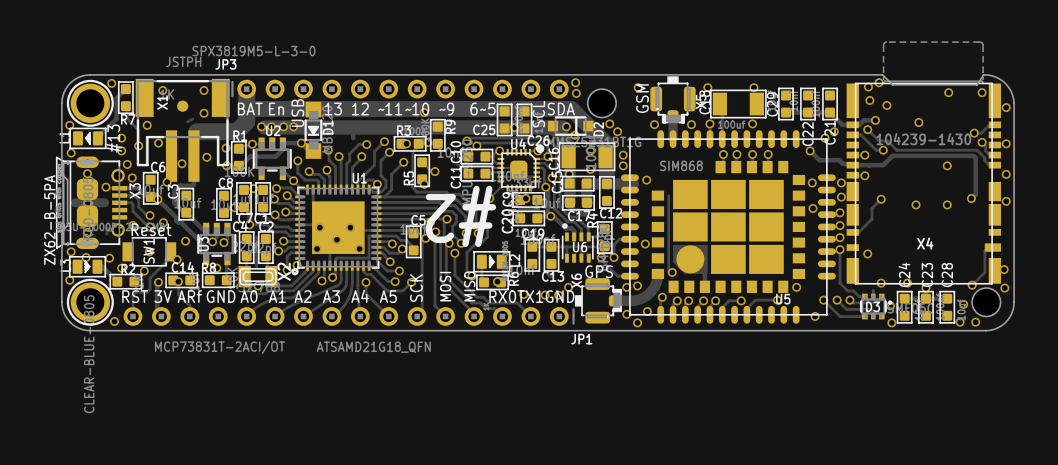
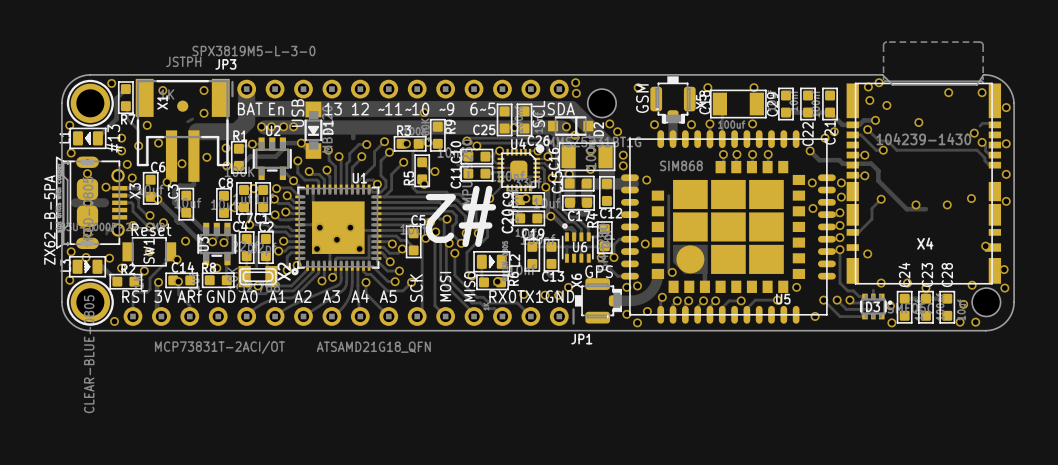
track: none -> (996, 123) (982, 123) (979, 126)
track: (994, 124) (989, 124) (981, 133) (974, 133) -> none
track: (842, 163) (883, 165) (892, 155) (973, 155) (975, 158) (975, 194) (971, 198) -> (842, 163) (871, 163) (878, 170) (878, 180) (906, 209) (925, 209)
via: (947, 165) -> none
via: none -> (985, 246)
track: (992, 247) (984, 251) (984, 272) (972, 285) -> none

